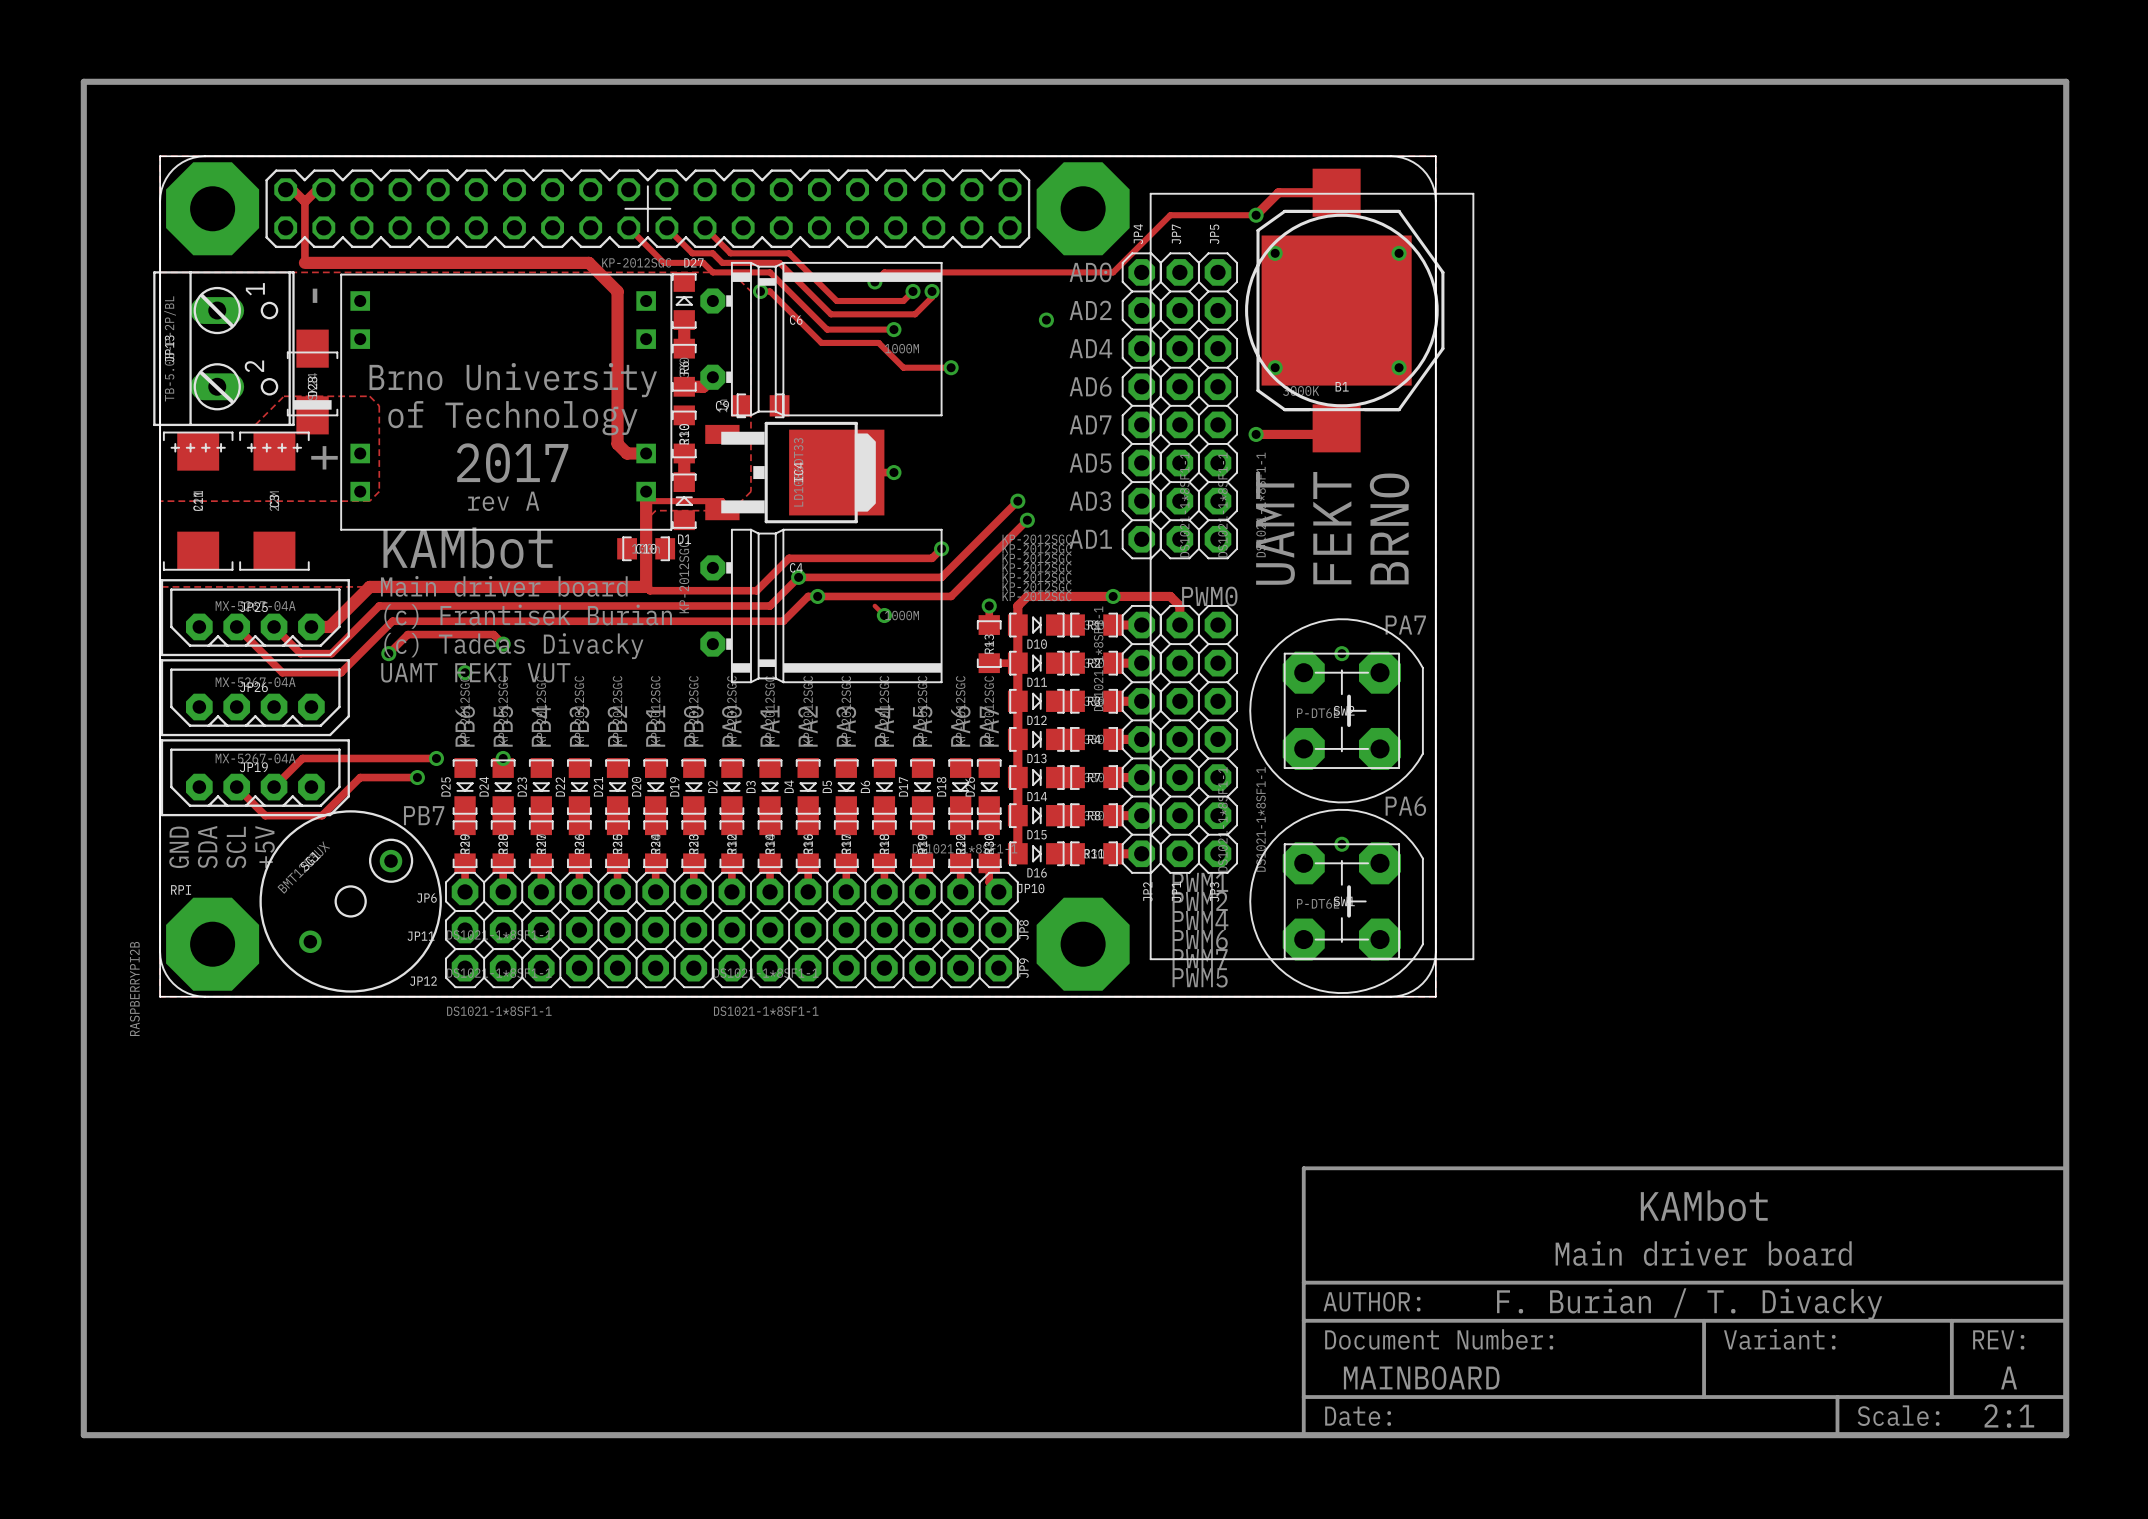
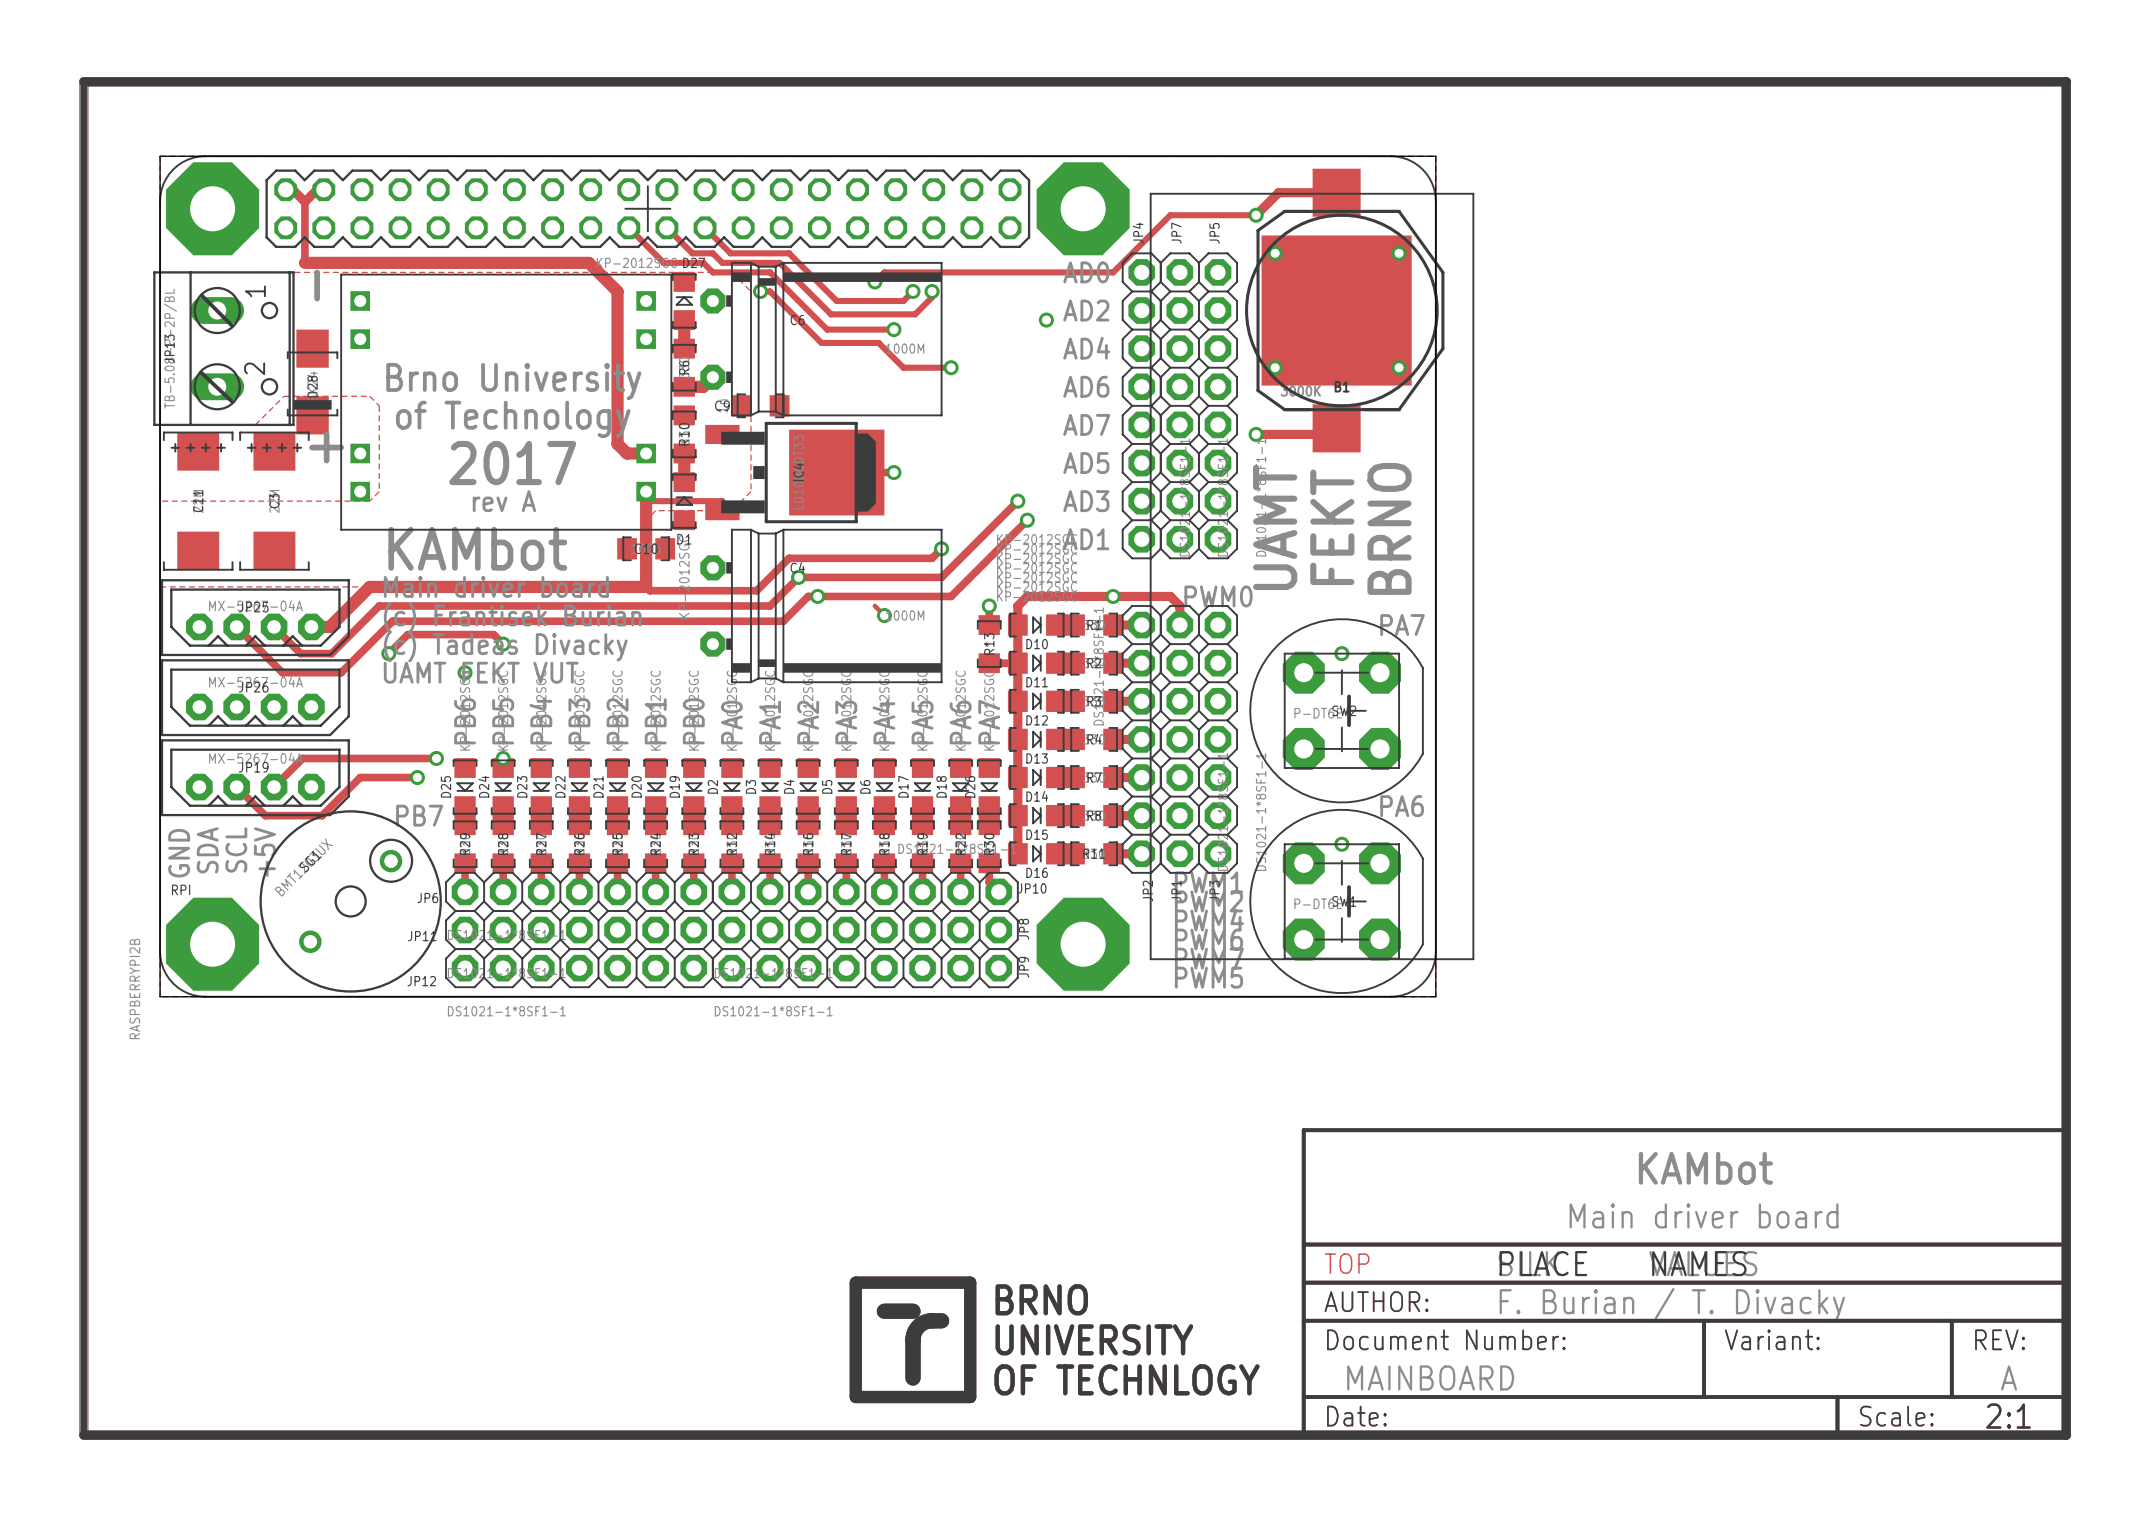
drawing shape: [80, 78, 2070, 1439] -> [79, 77, 2071, 1440]
drawing: none -> [849, 1128, 2069, 1438]
drawing: [1301, 1166, 2069, 1438] -> none

